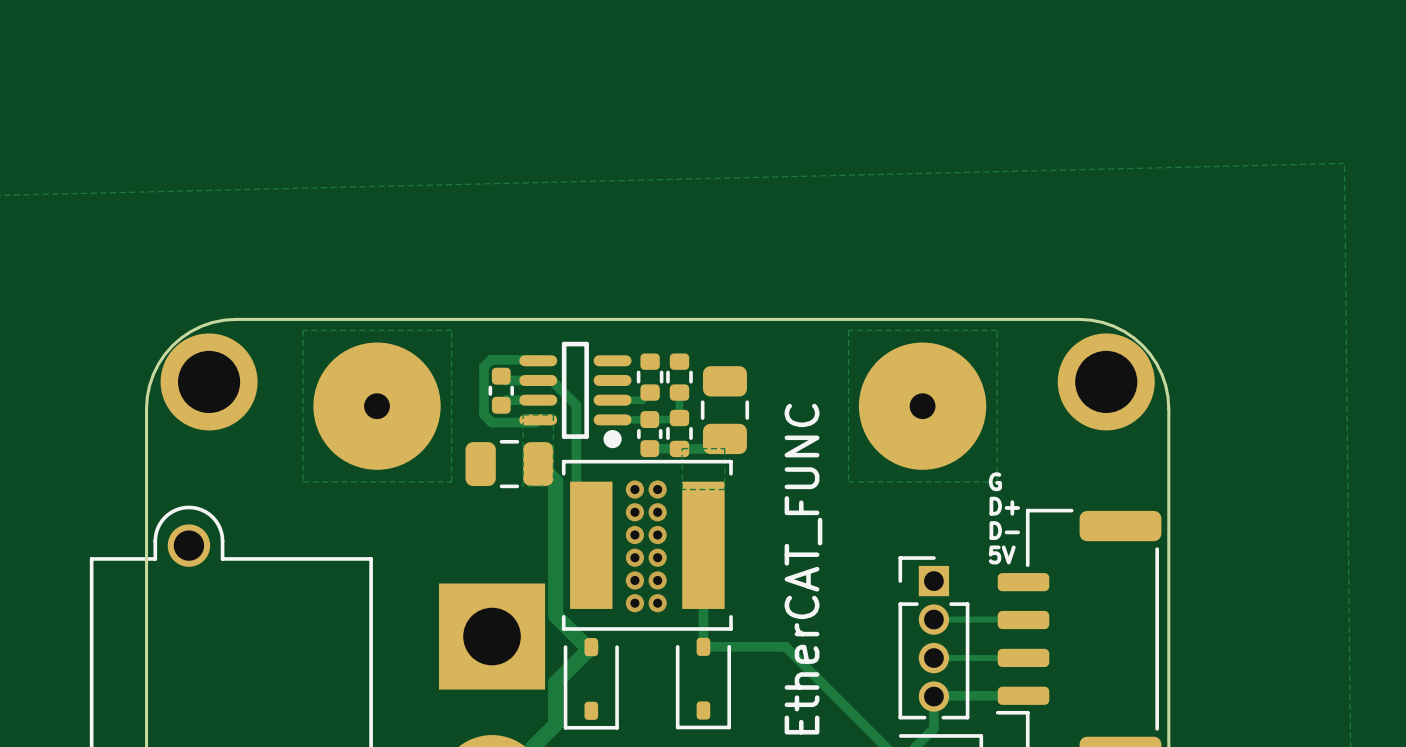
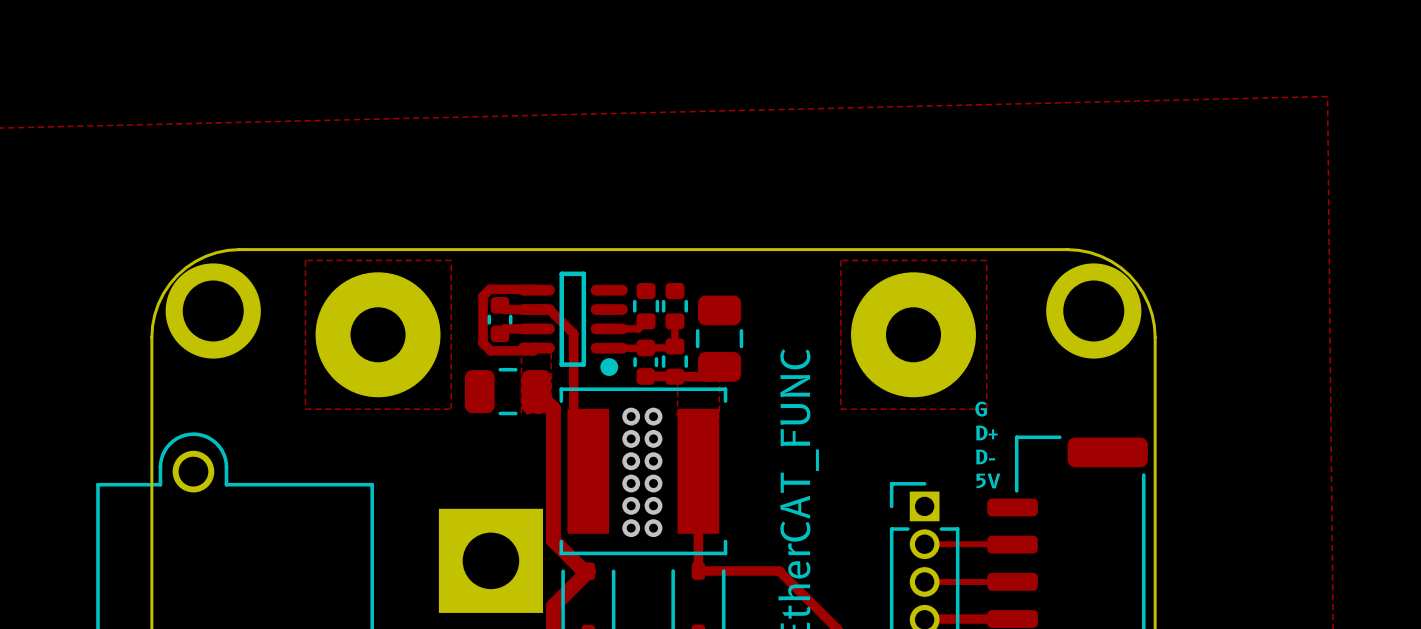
part footprint: [313, 342, 441, 470] -> [315, 272, 441, 398]
part footprint: [858, 342, 987, 470] -> [851, 272, 976, 398]

